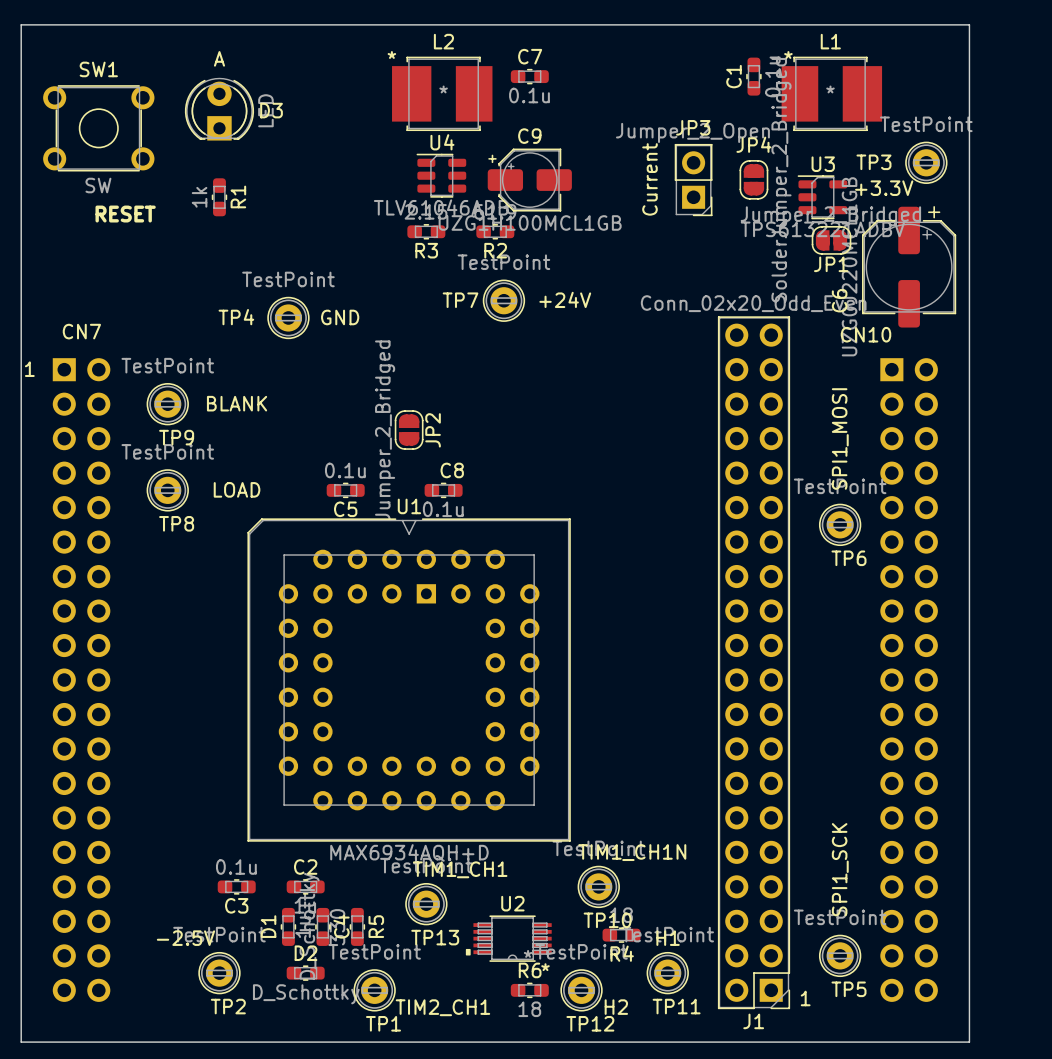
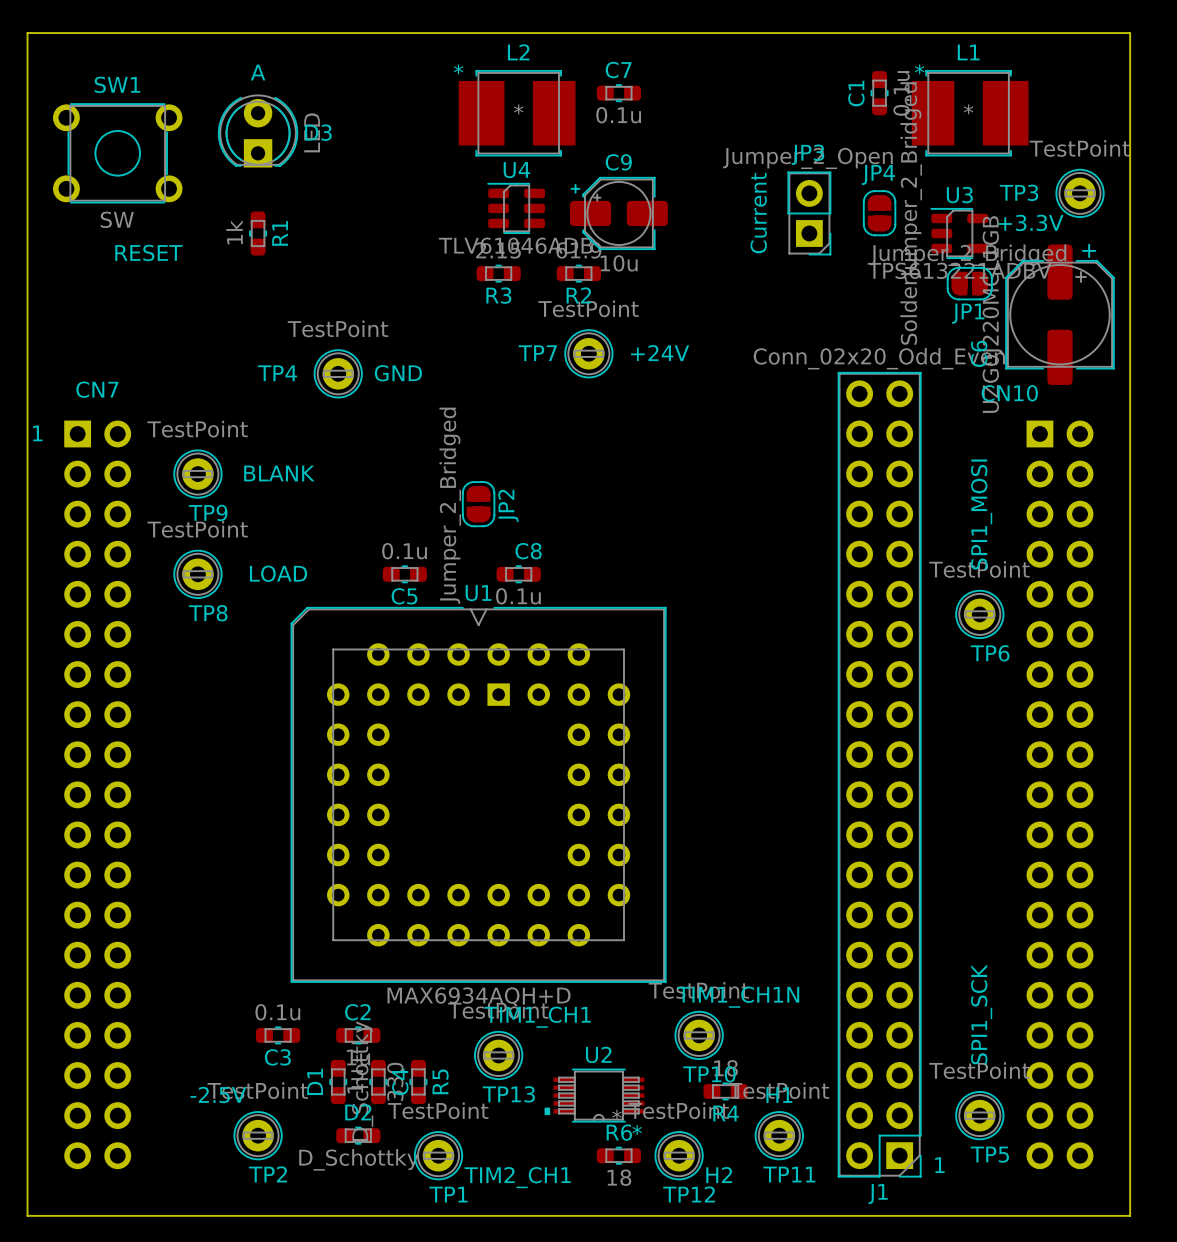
C9 value: UZG1H100MCL1GB (530, 222) -> 10u (619, 263)

